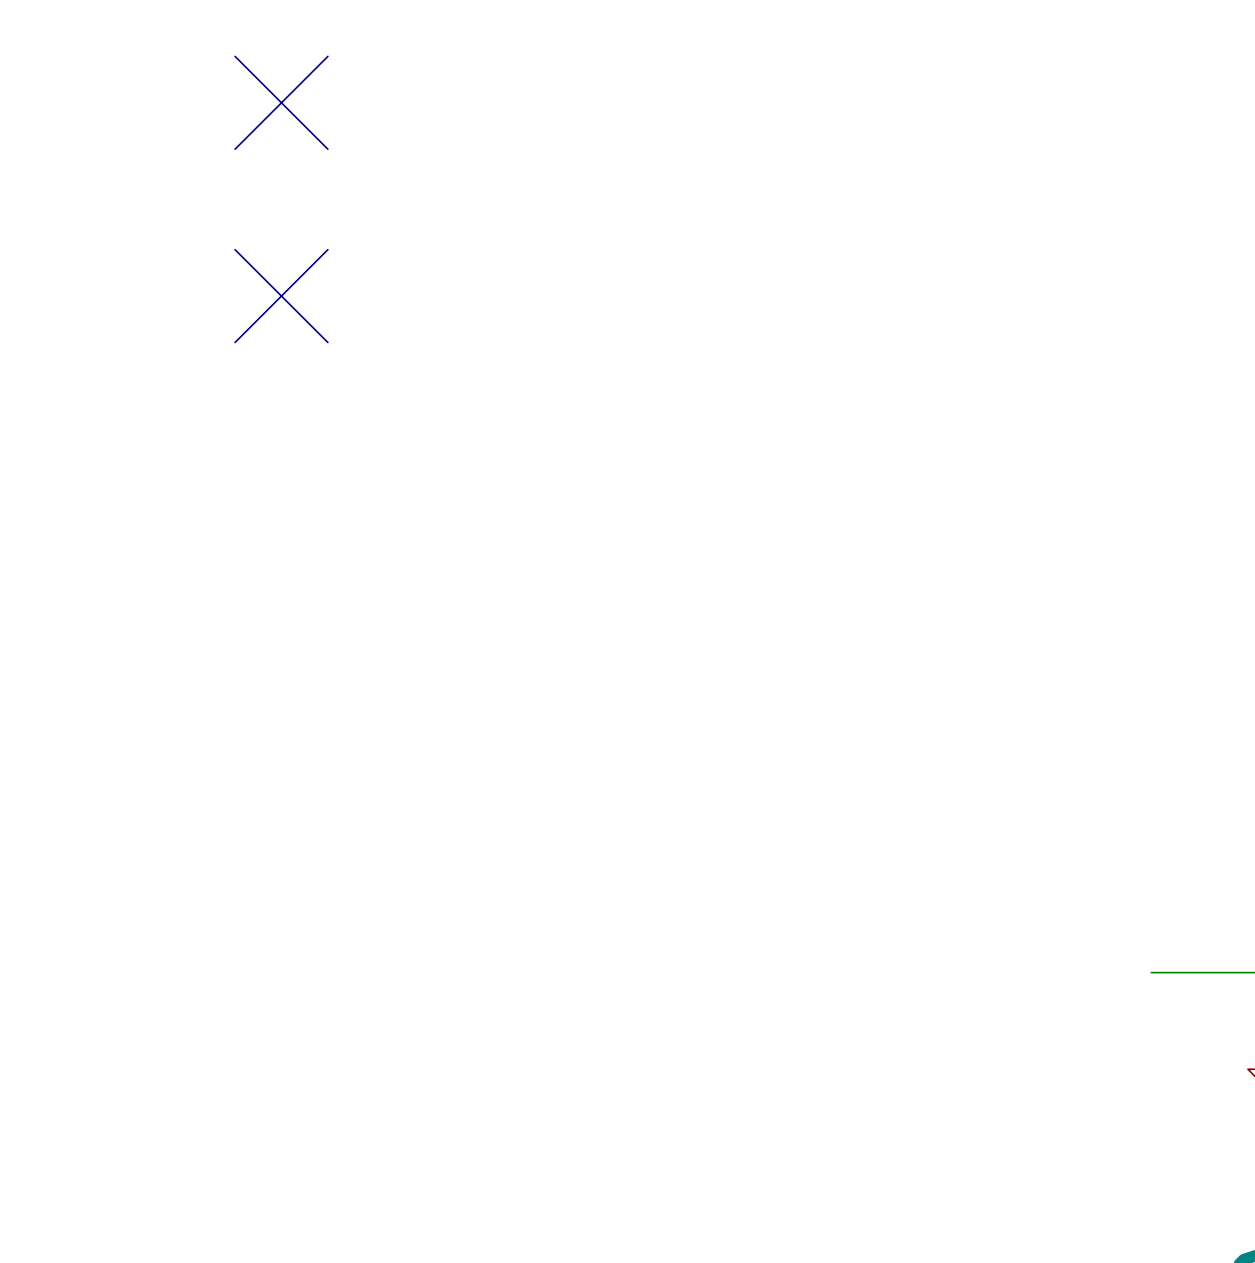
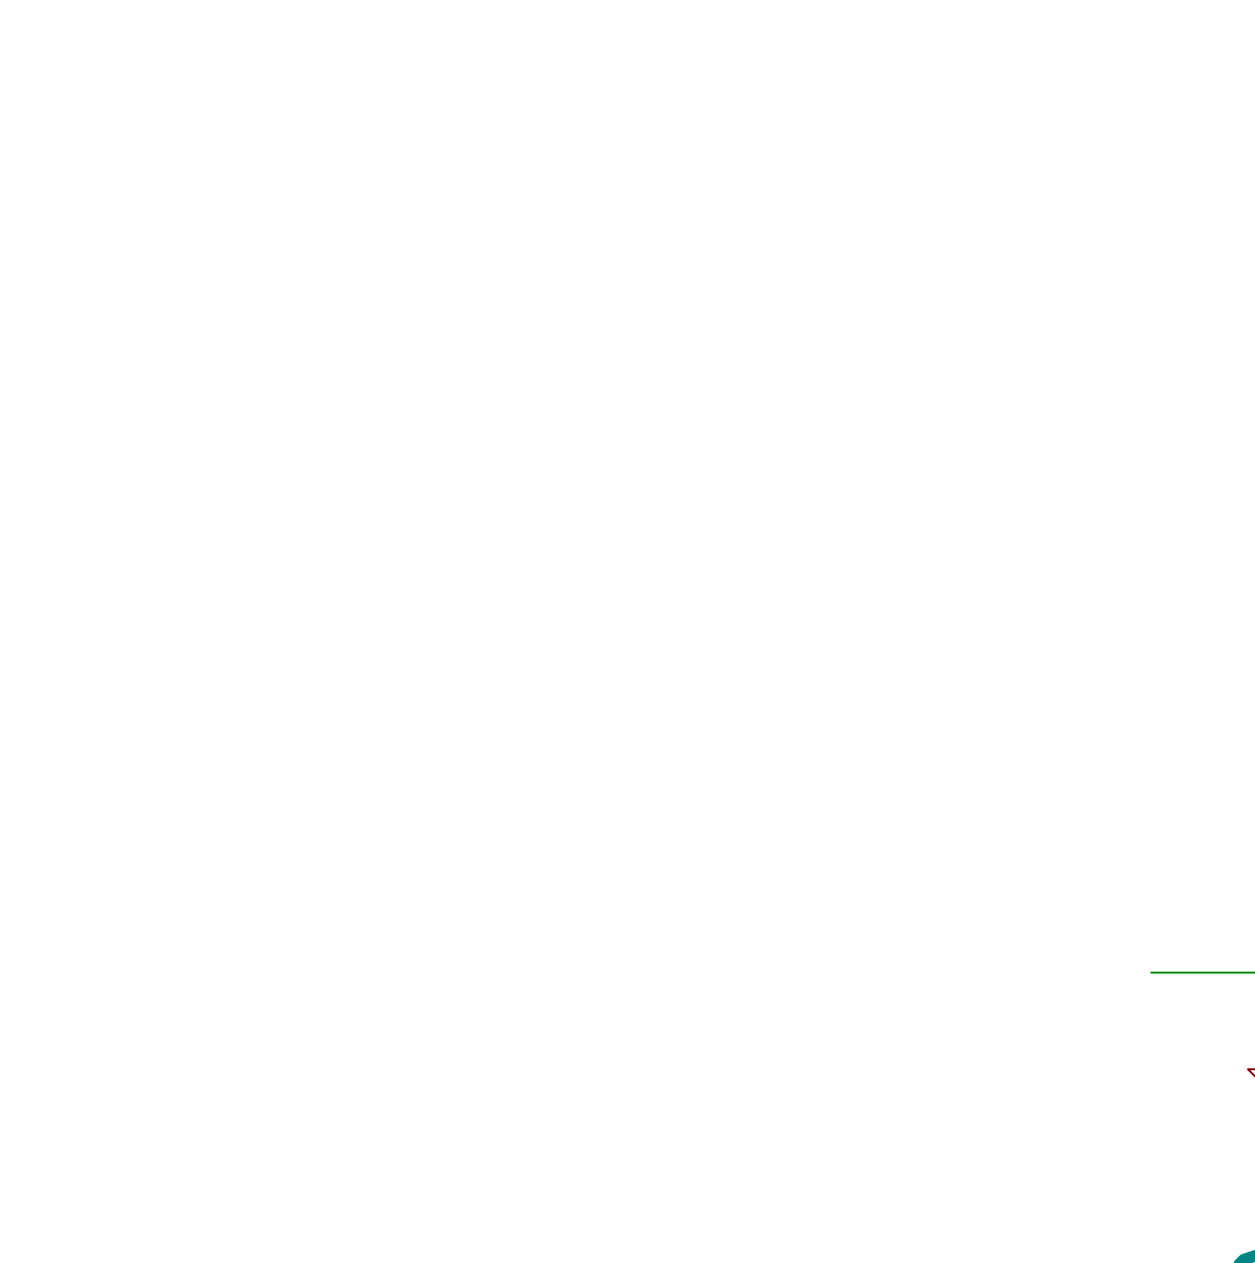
no-connect mark: (281, 102) -> none
no-connect mark: (281, 296) -> none

